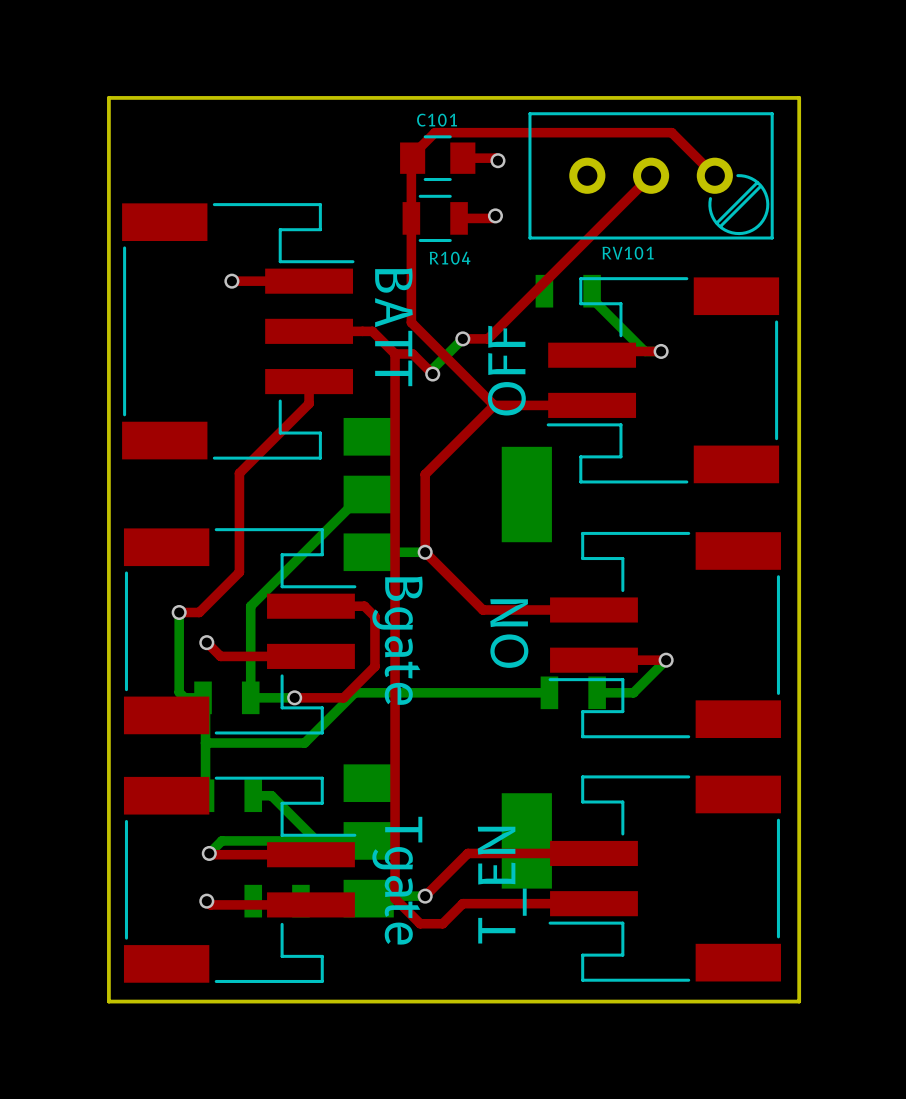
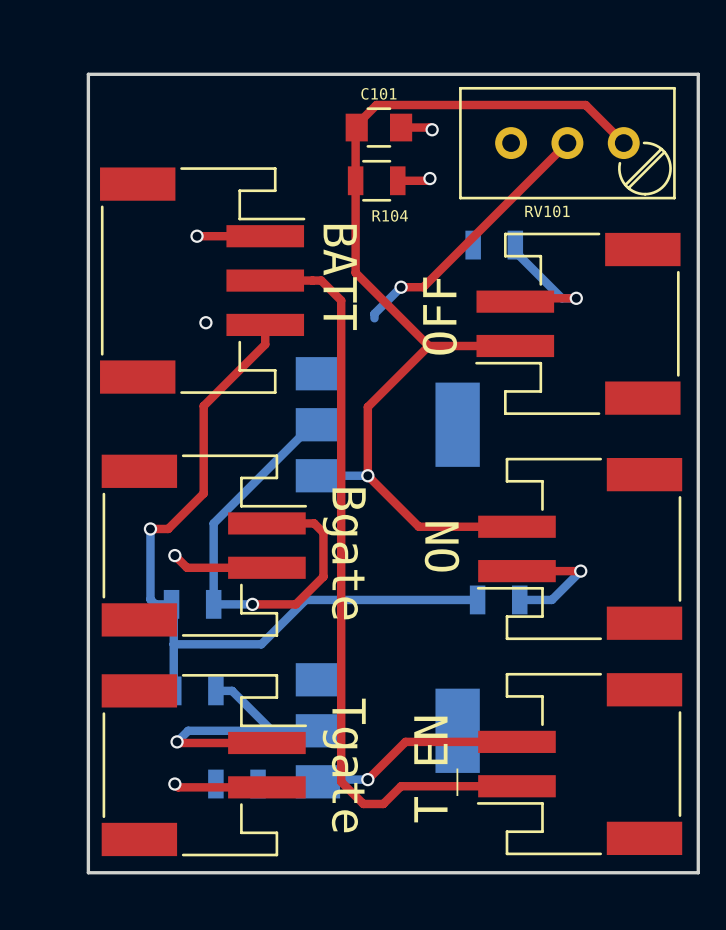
top track: (395, 353) (412, 353) (432, 374) -> none
via: (432, 374) -> none
via: none -> (205, 322)

